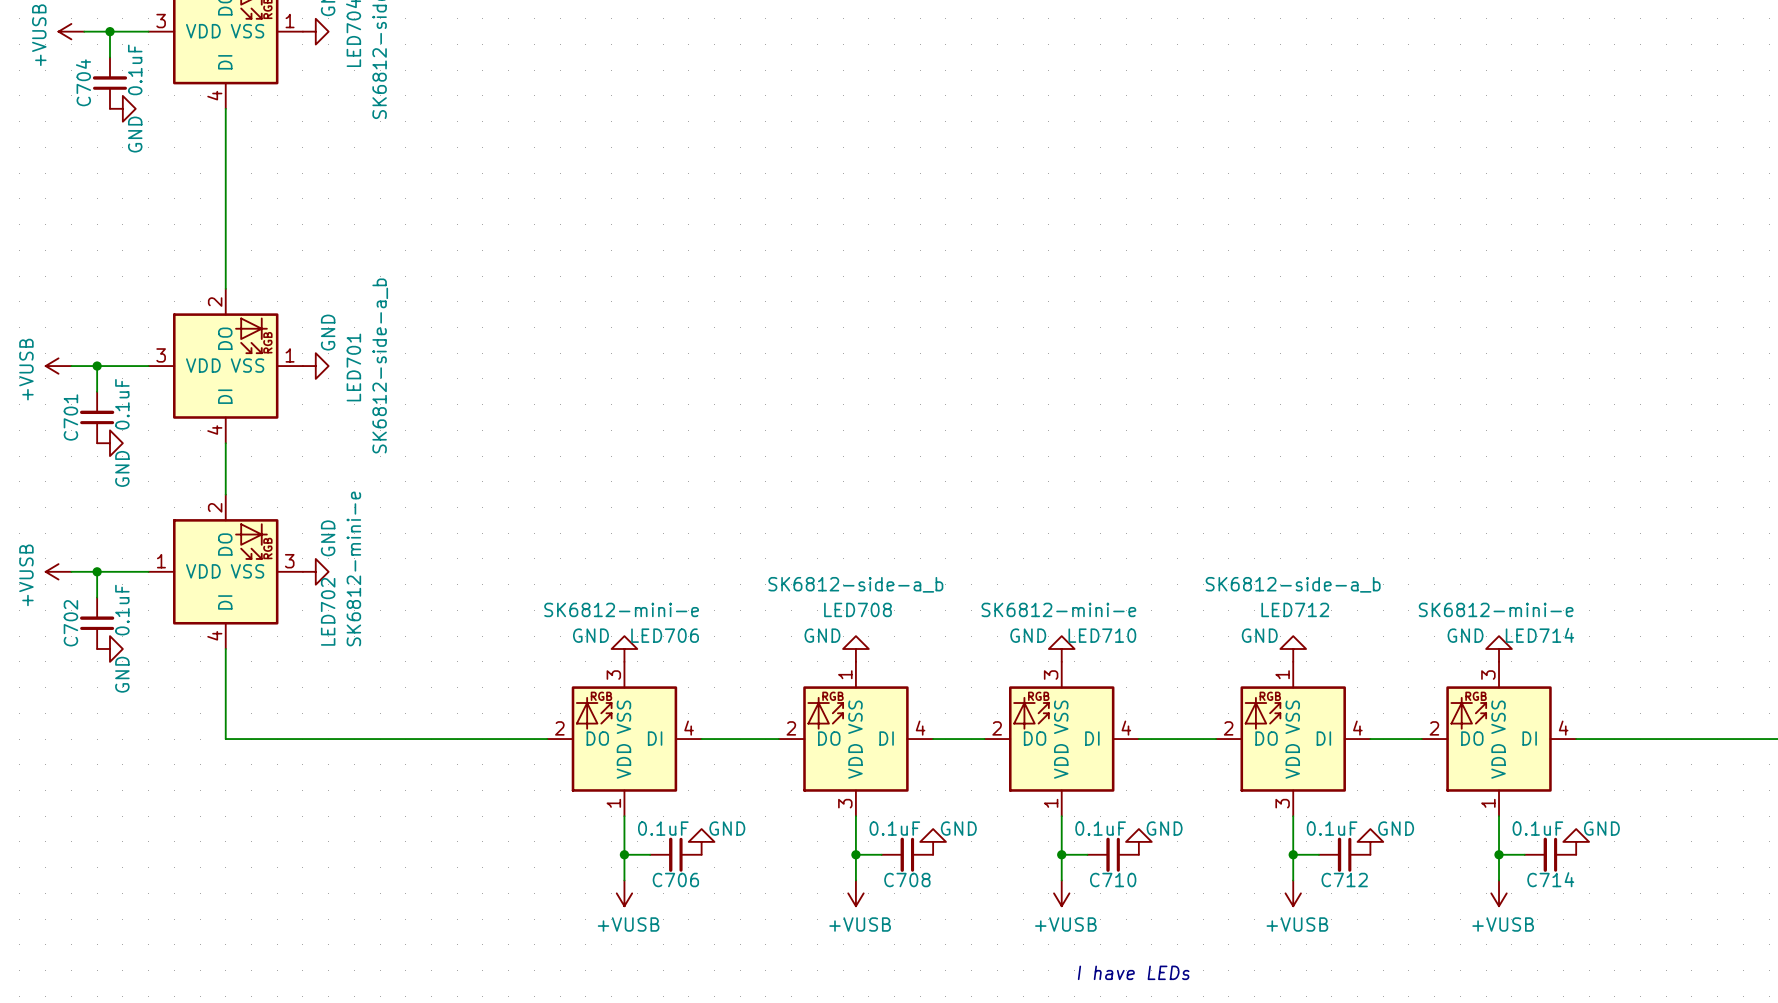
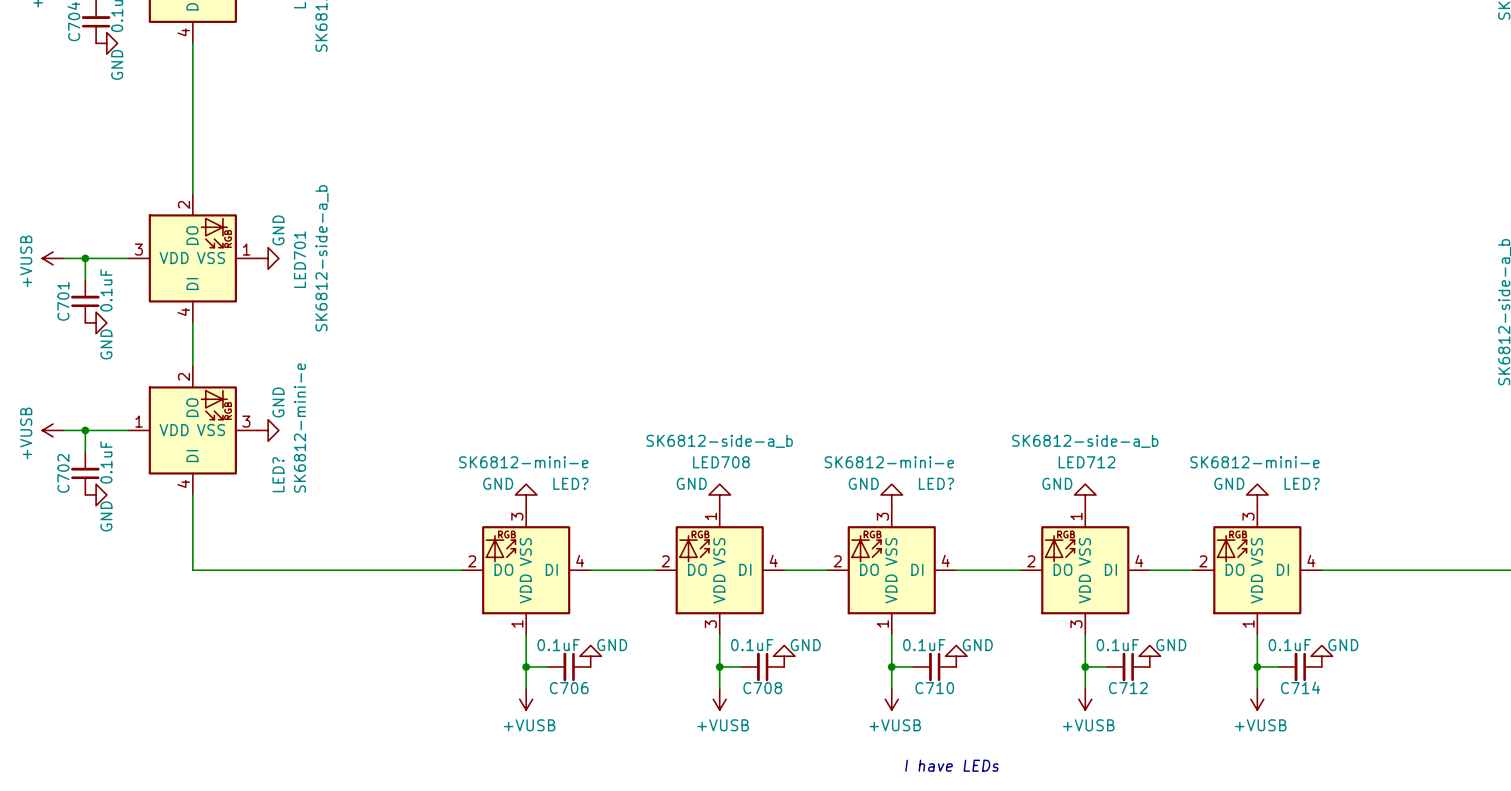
LED702 name: LED702 (328, 611) -> LED? (278, 474)
LED706 name: LED706 (665, 635) -> LED? (570, 483)
LED710 name: LED710 (1102, 635) -> LED? (936, 483)
LED714 name: LED714 (1539, 635) -> LED? (1302, 483)

